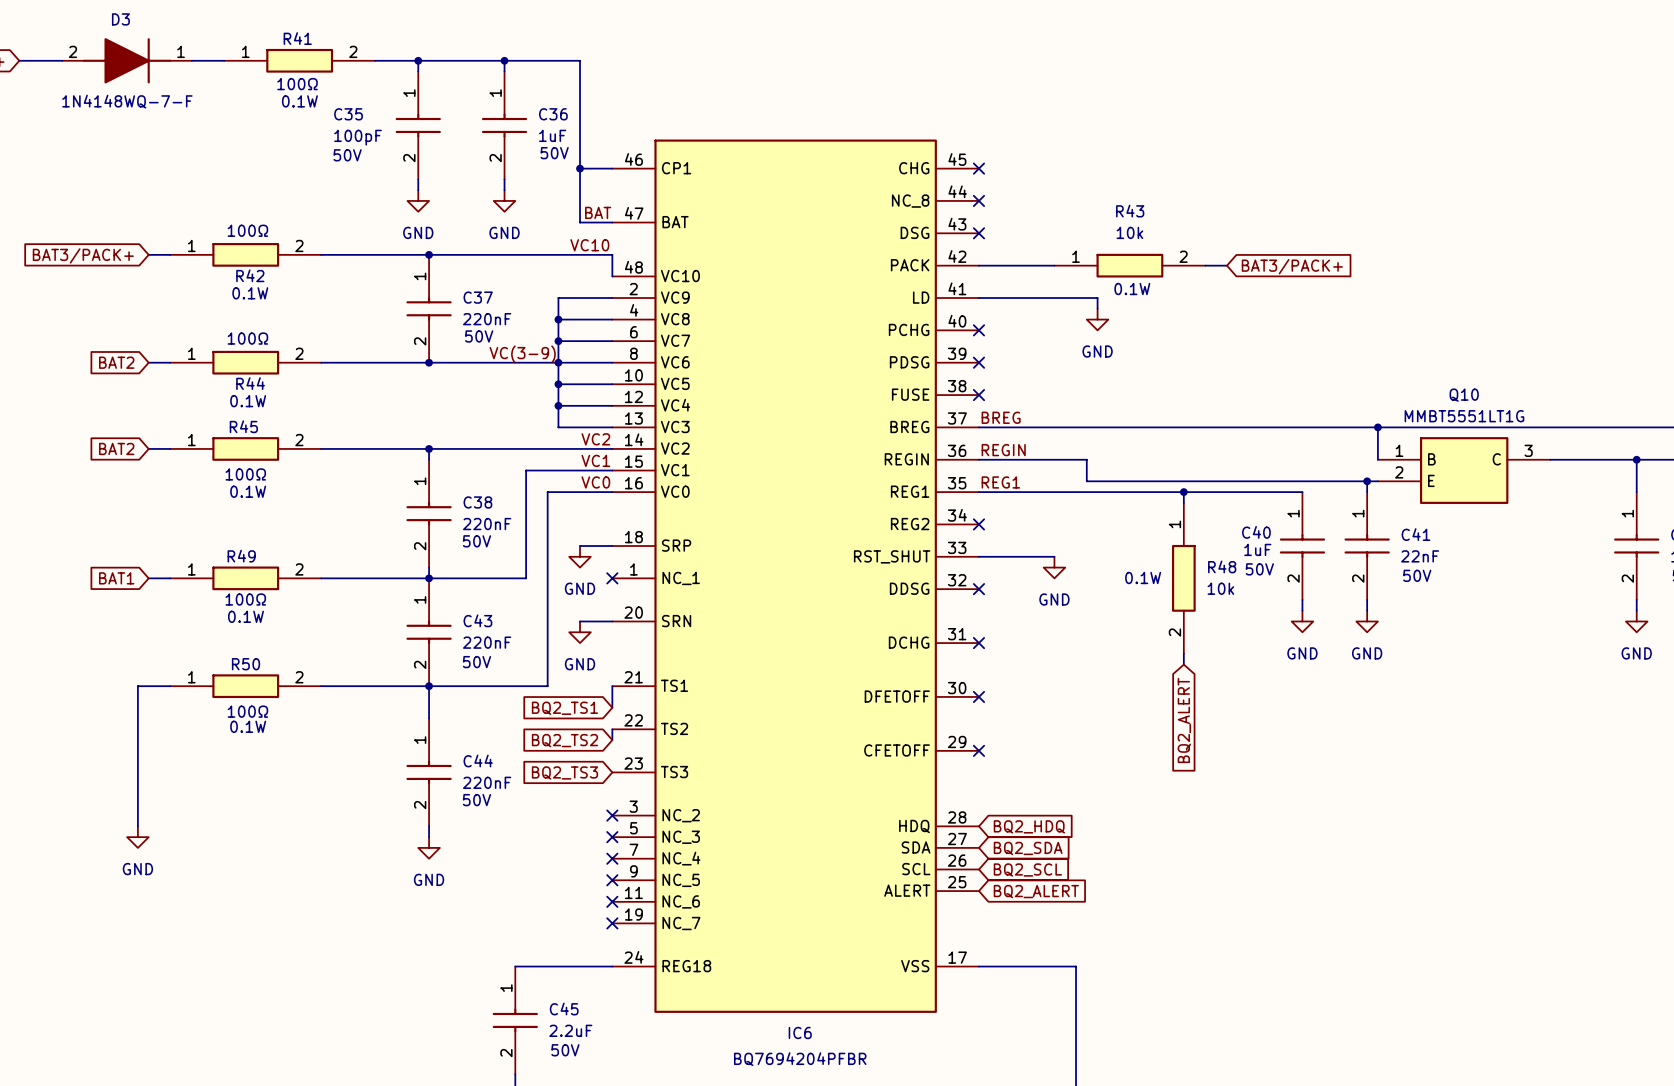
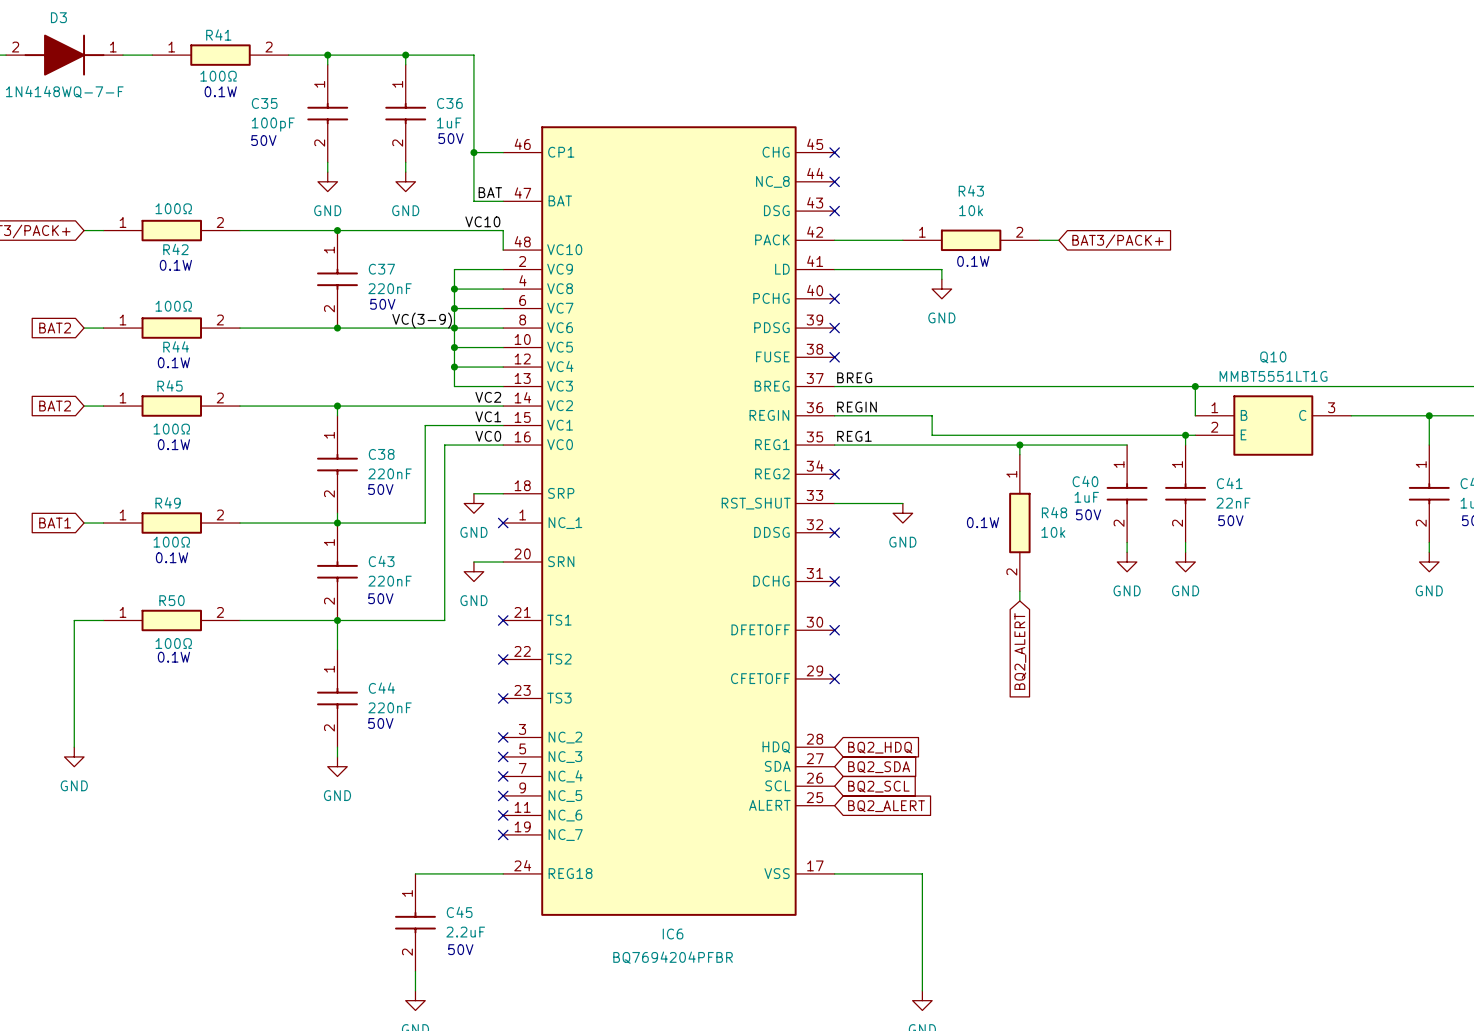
wire: (612, 686) (612, 707) -> none
no-connect mark: none -> (503, 620)
global label: BQ2_TS1 (564, 708) -> none
wire: (612, 729) (612, 740) -> none
no-connect mark: none -> (503, 659)
global label: BQ2_TS2 (564, 740) -> none
global label: BQ2_TS3 (564, 772) -> none
no-connect mark: none -> (503, 698)

